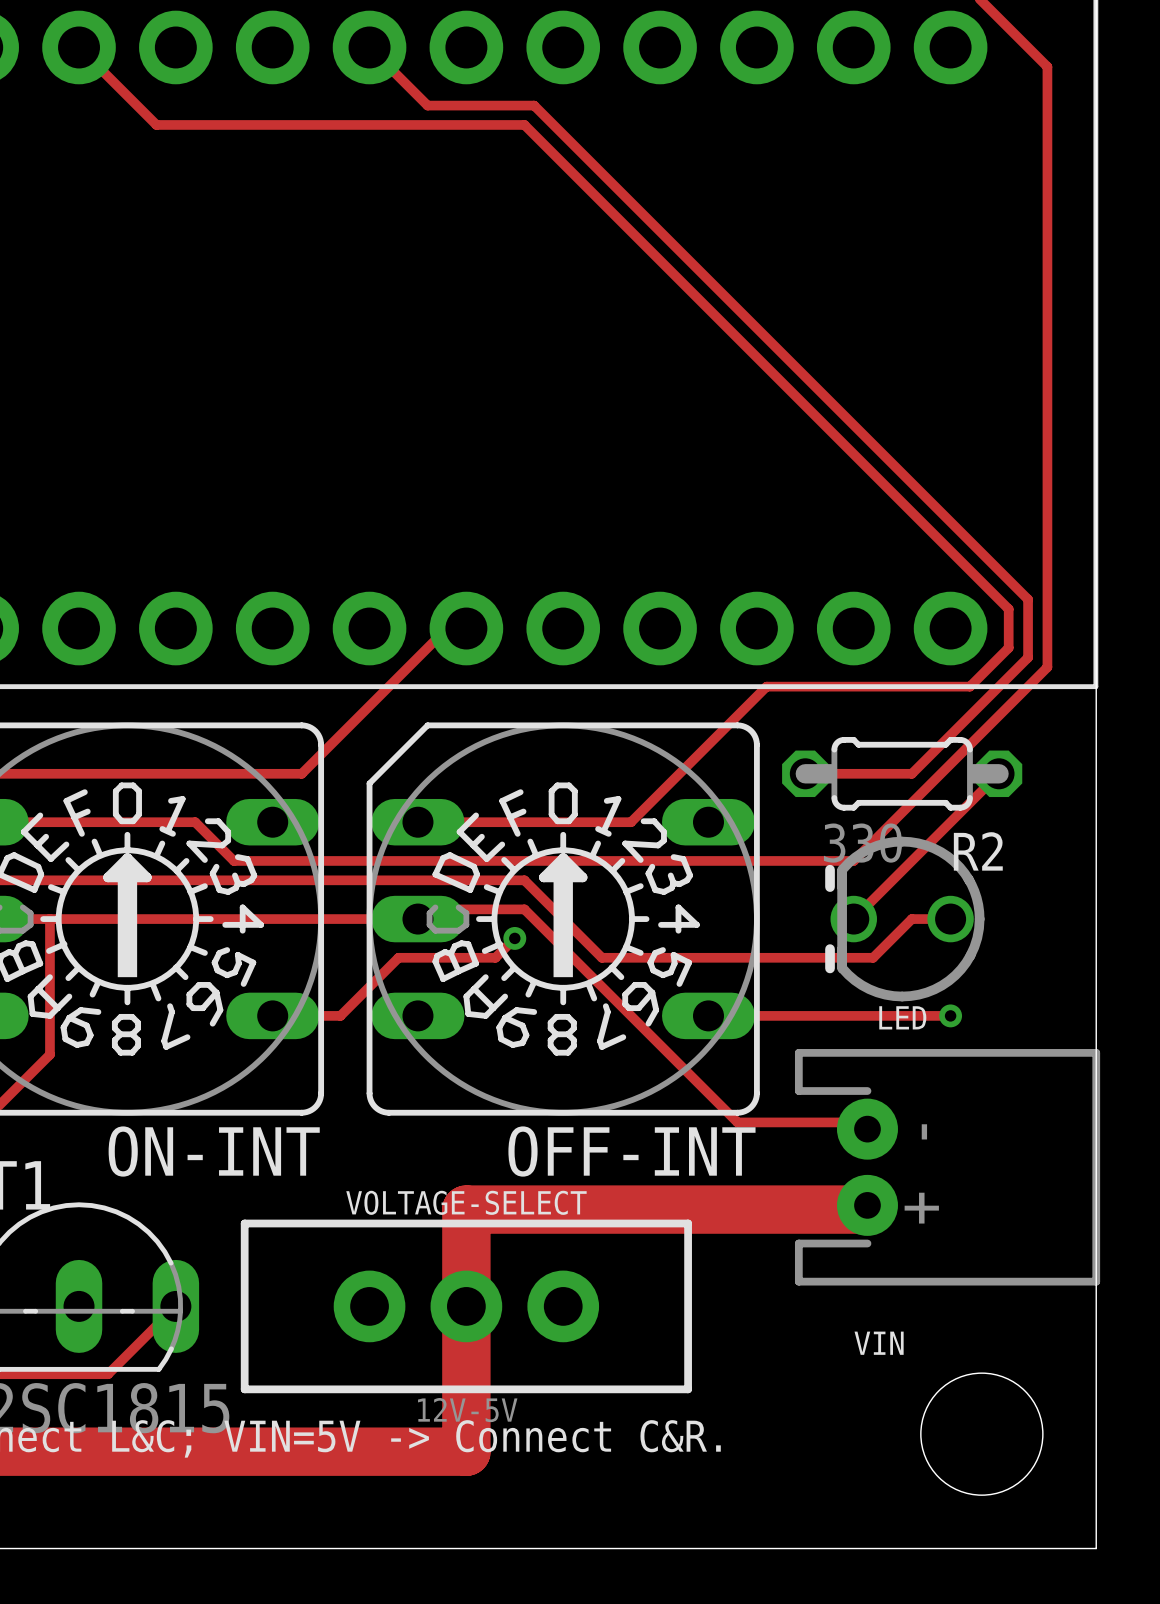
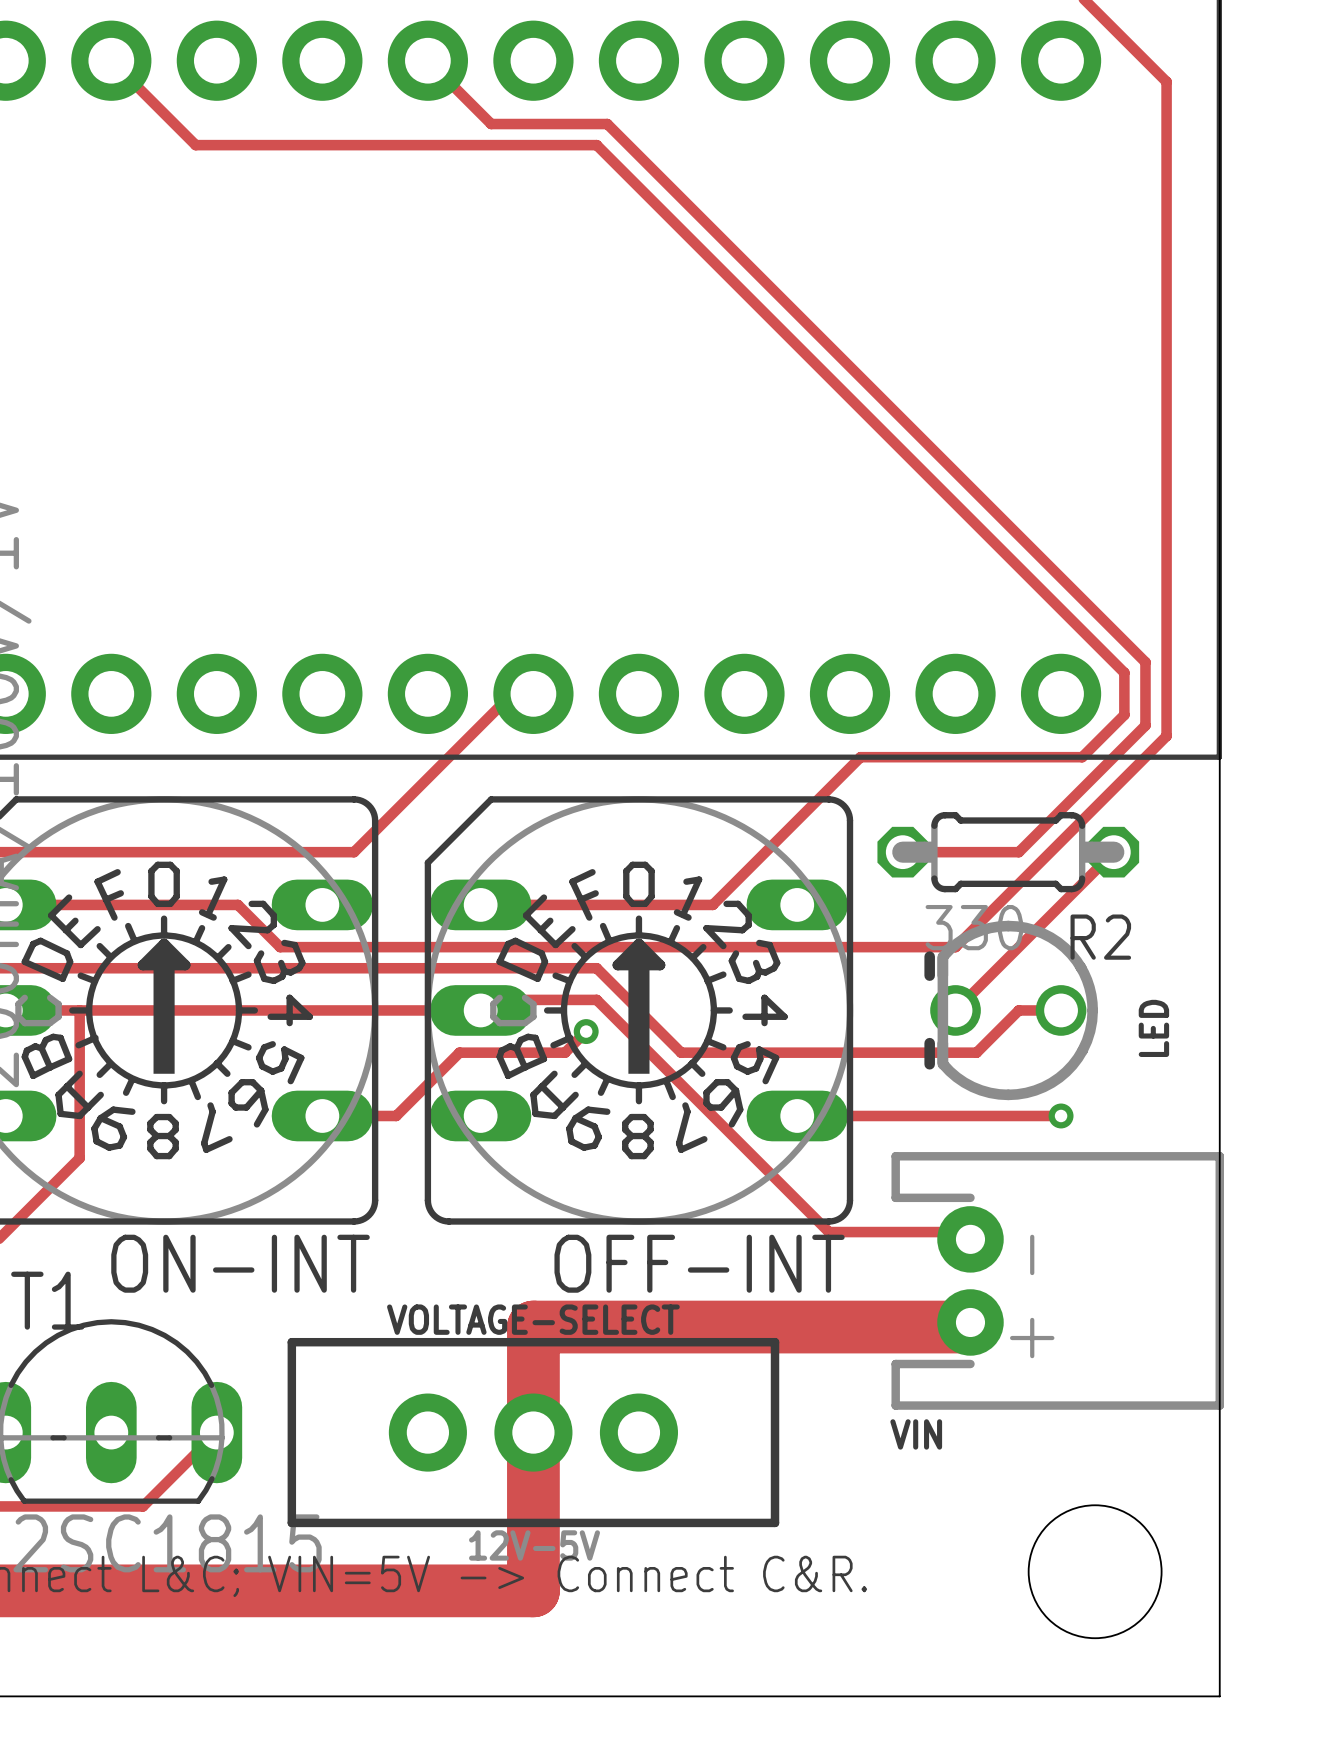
LED name rotation: 0° (902, 1017) -> 90° counterclockwise (1153, 1028)
LED name position: LED (902, 1017) -> LED (1153, 1028)
VIN name position: VIN (879, 1343) -> VIN (916, 1434)

